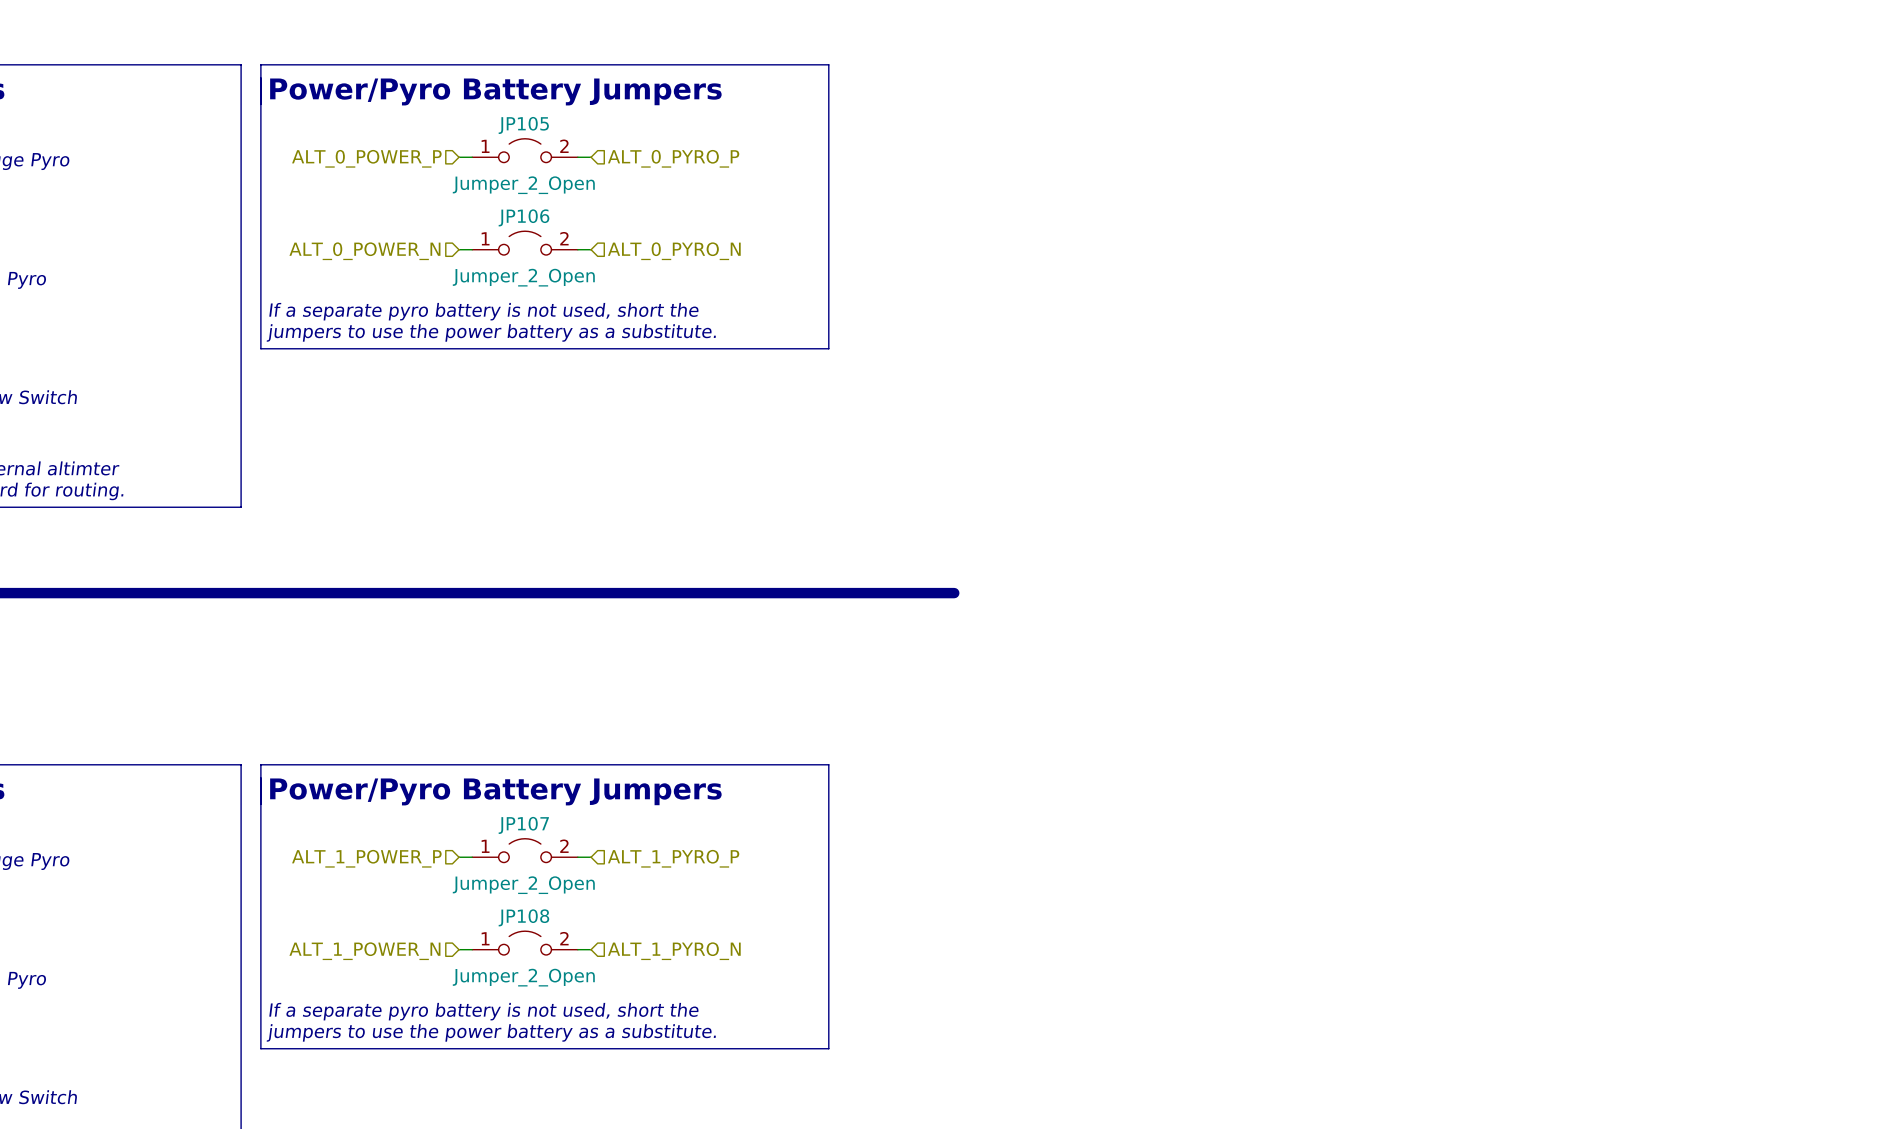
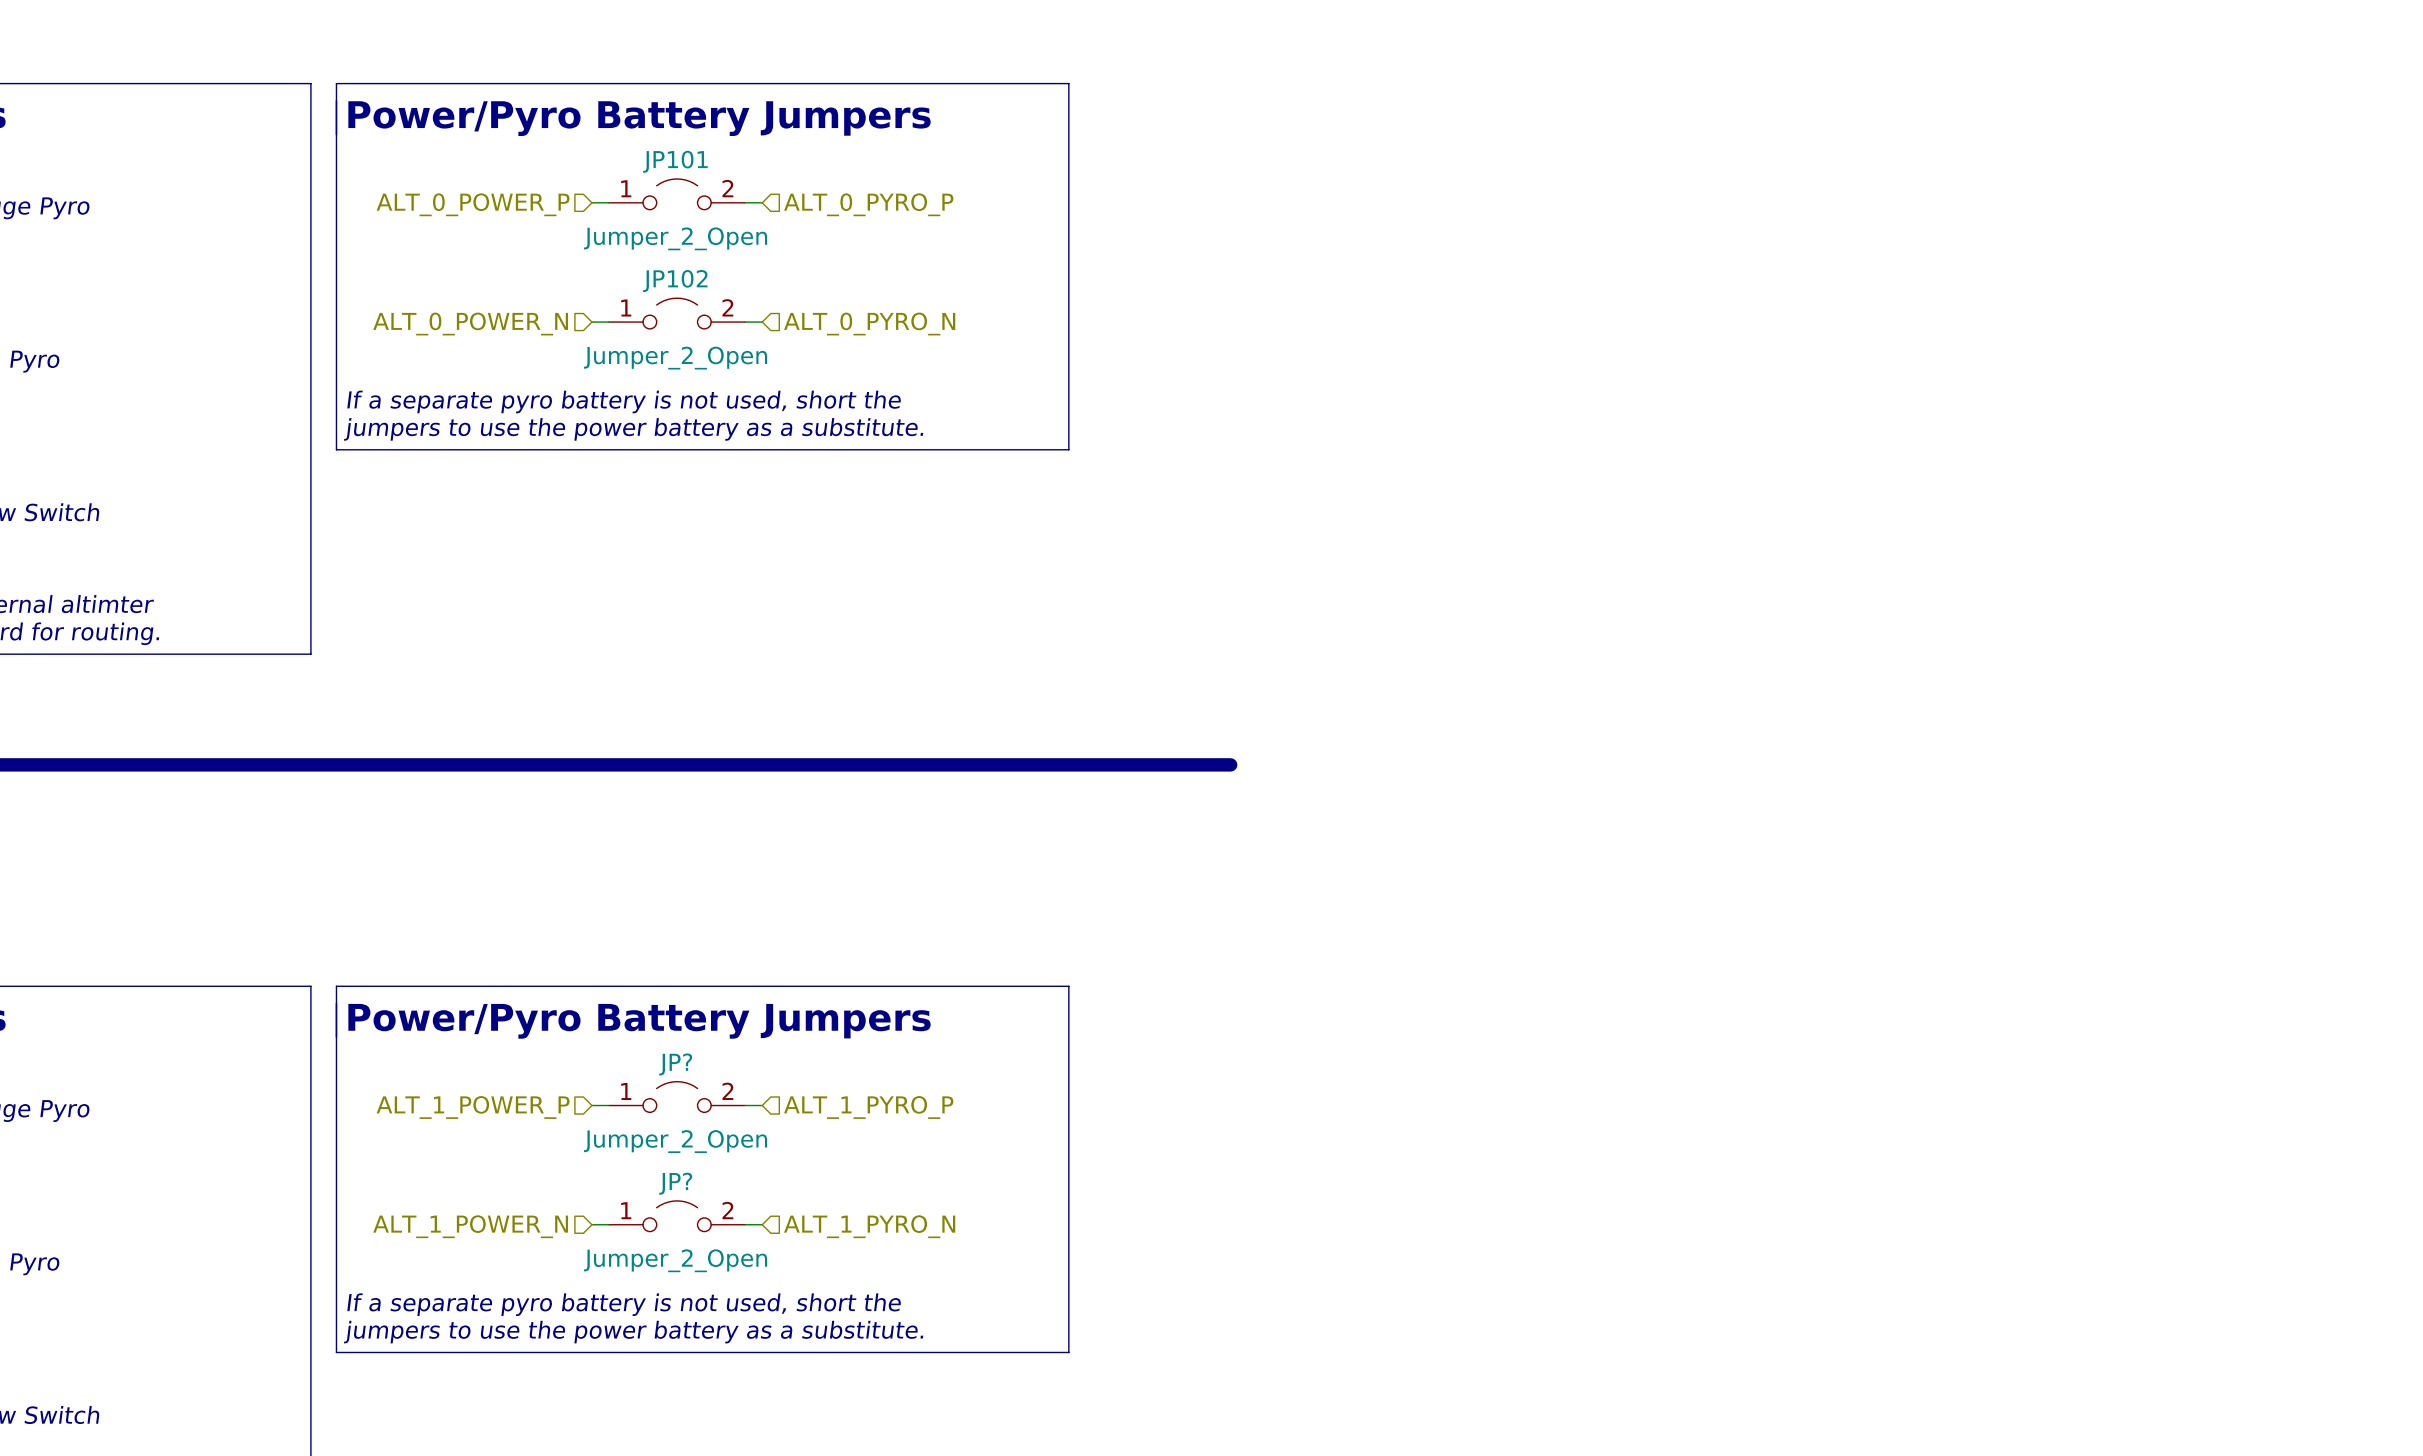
JP105 name: JP105 (523, 125) -> JP101 (675, 161)
JP106 name: JP106 (524, 217) -> JP102 (675, 281)
JP107 name: JP107 (523, 825) -> JP? (675, 1064)
JP108 name: JP108 (523, 917) -> JP? (675, 1183)

